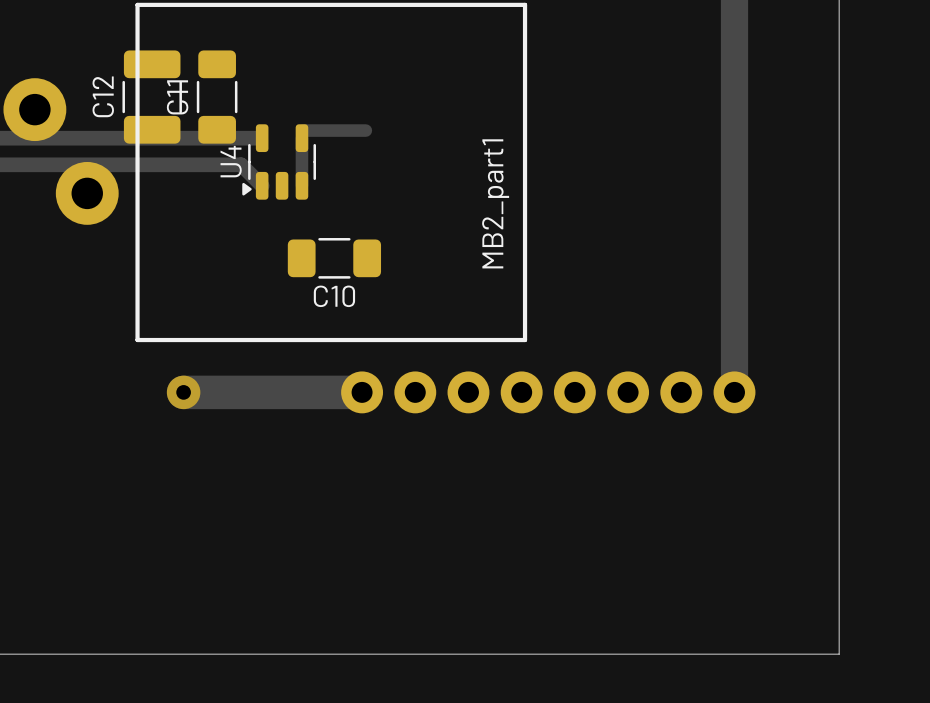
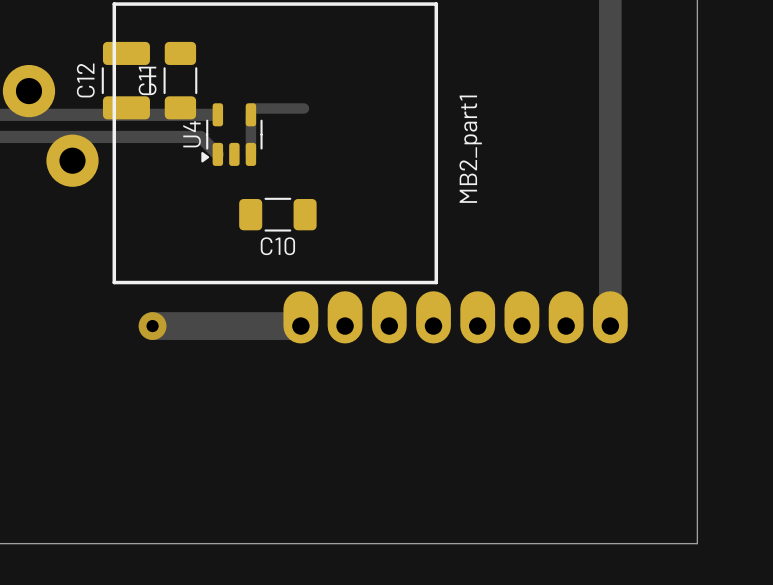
MB2_part1 name position: MB2_part1 (495, 203) -> MB2_part1 (470, 149)
MB2_part1 footprint: [341, 371, 756, 414] -> [283, 291, 628, 344]

